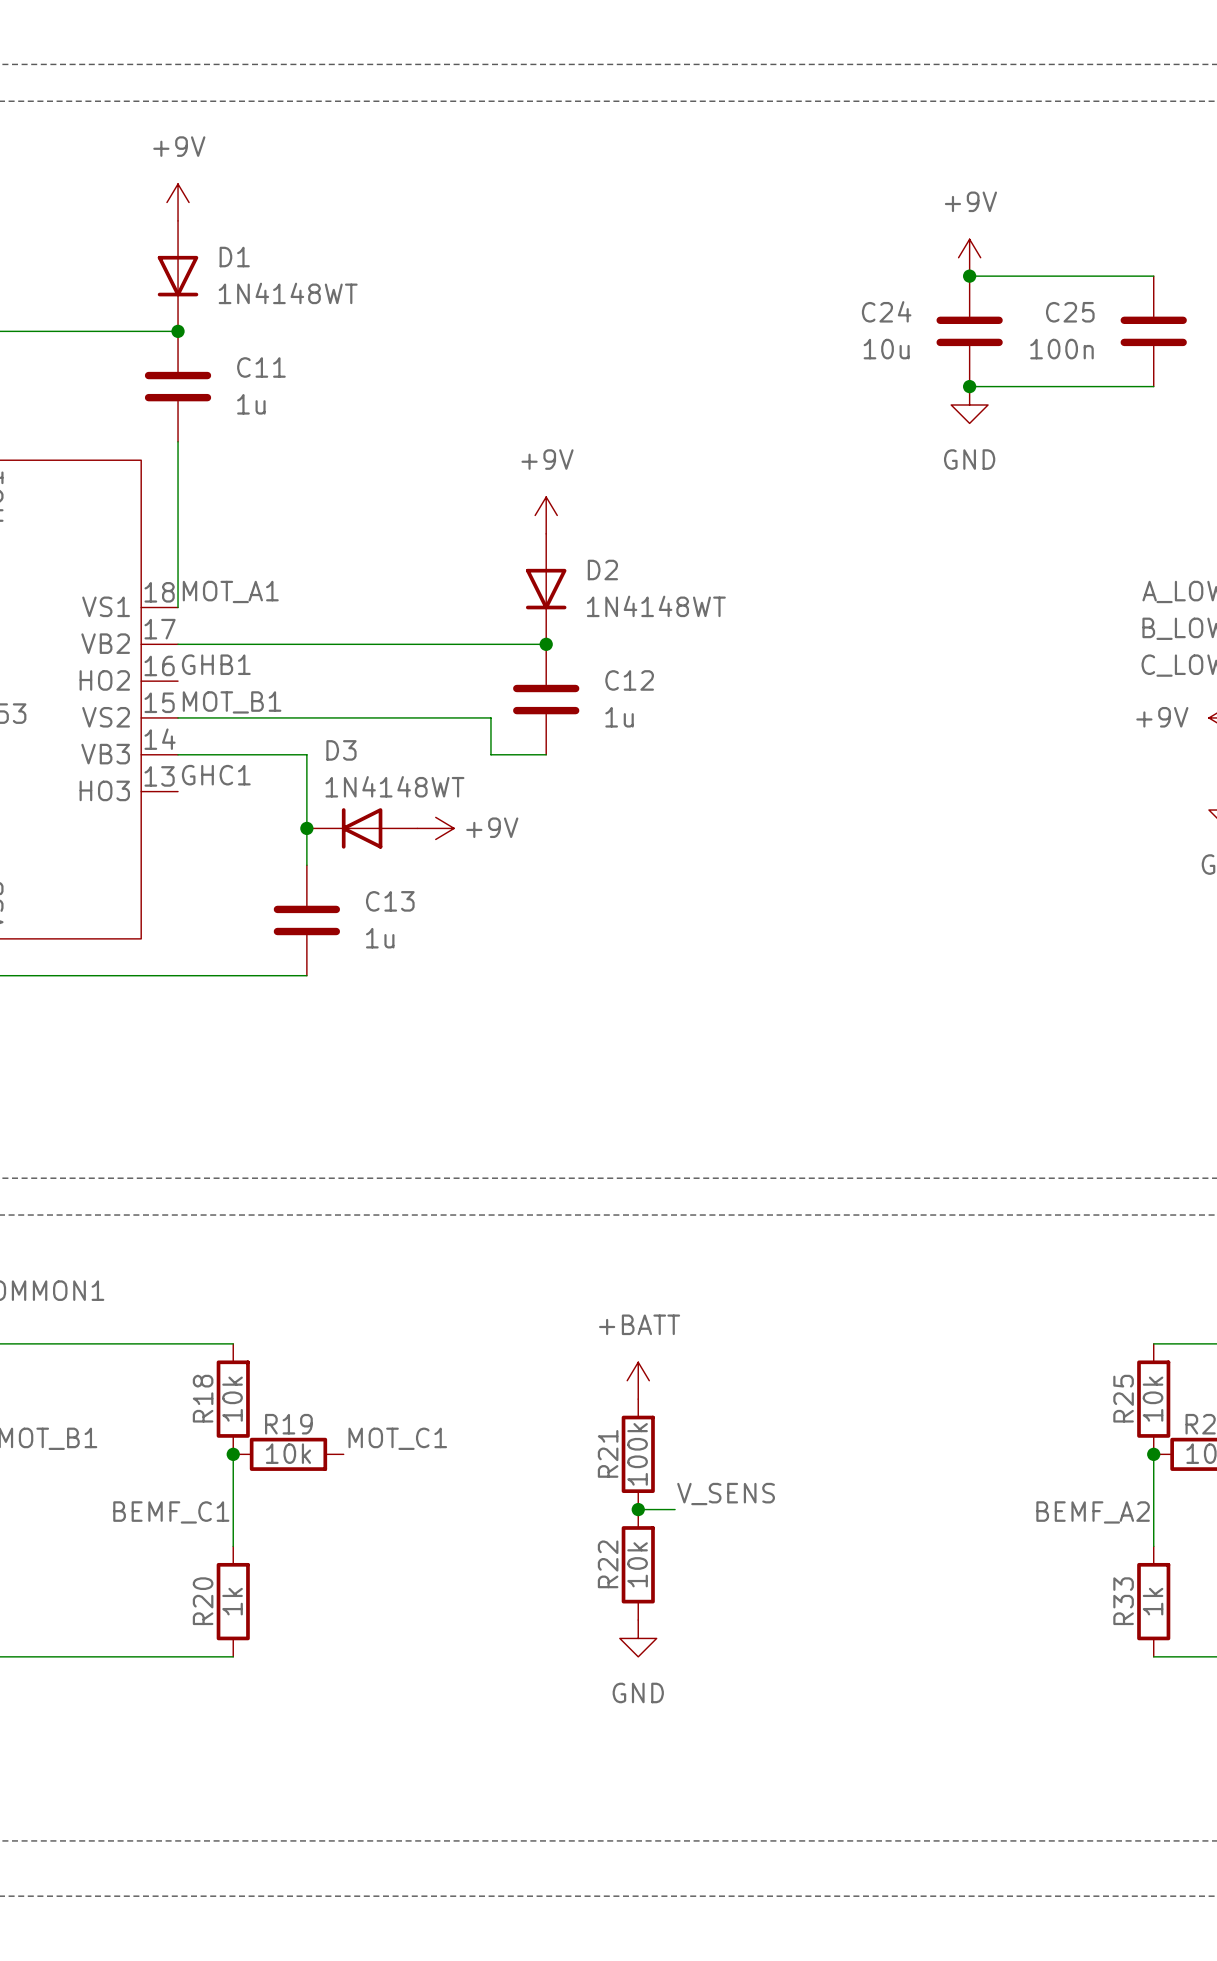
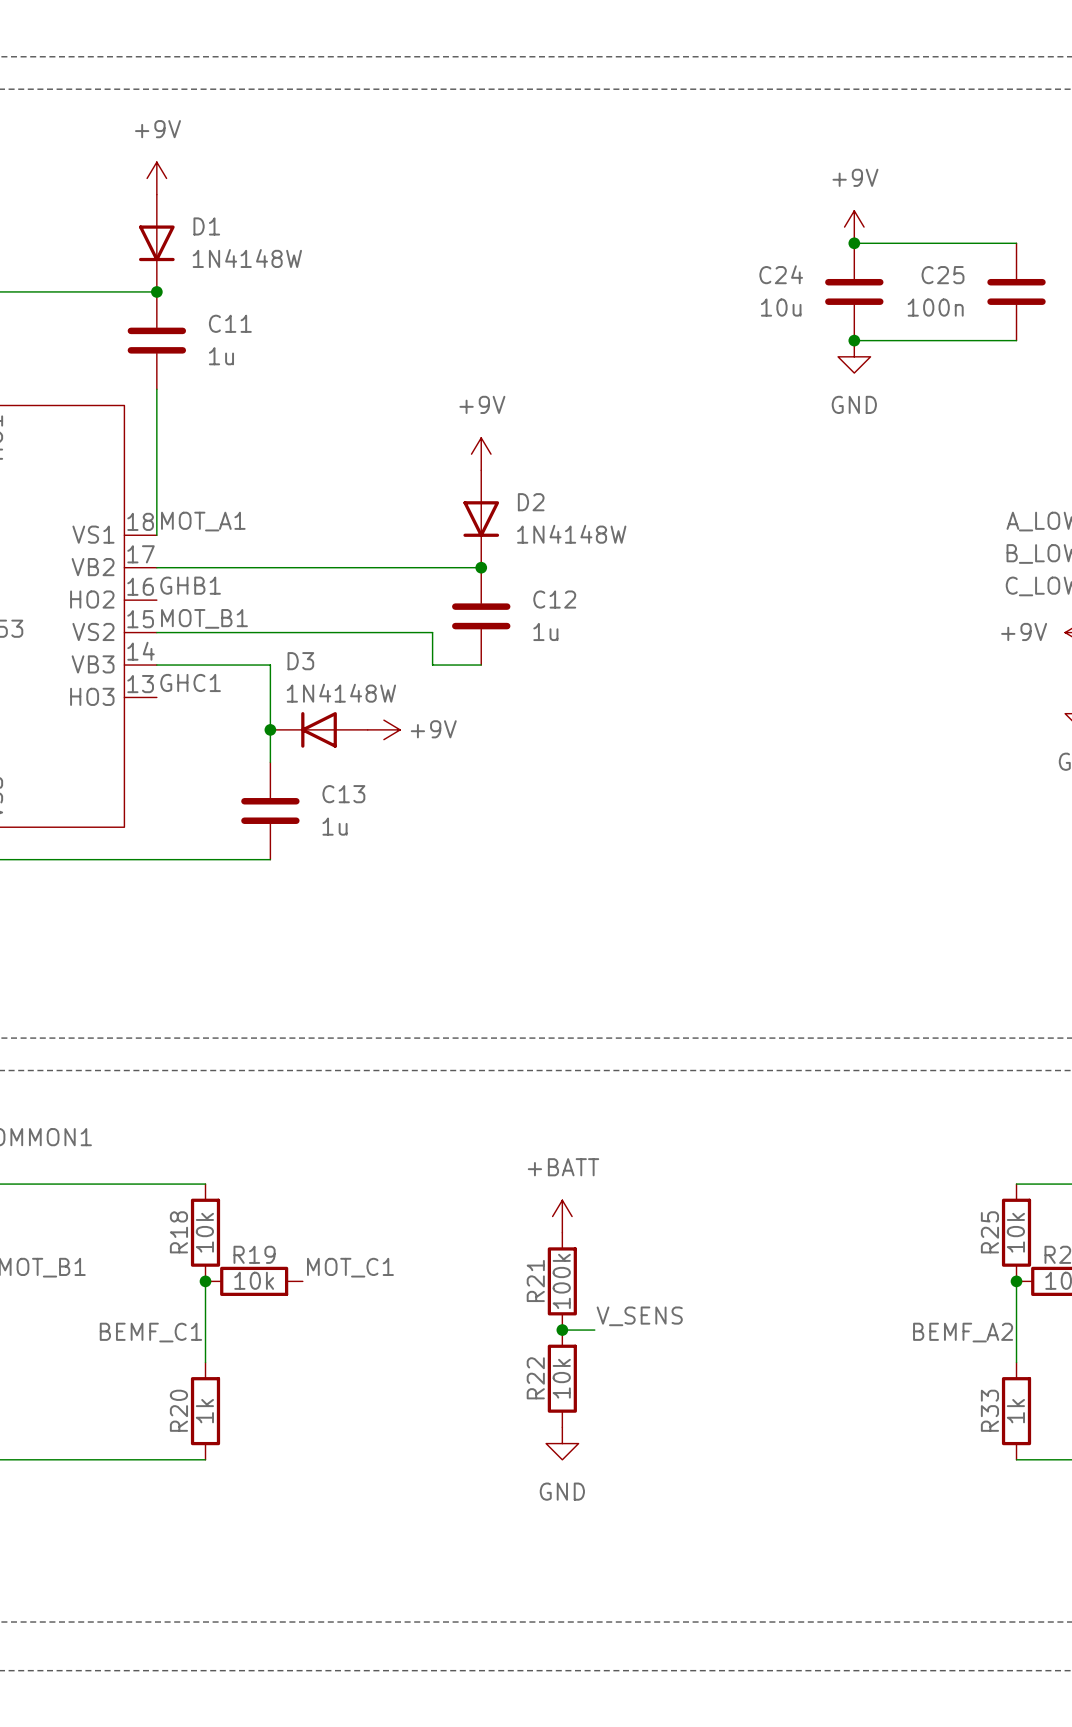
D1 value: 1N4148WT (288, 293) -> 1N4148W (247, 258)
D2 value: 1N4148WT (656, 606) -> 1N4148W (571, 534)
D3 value: 1N4148WT (394, 786) -> 1N4148W (341, 693)

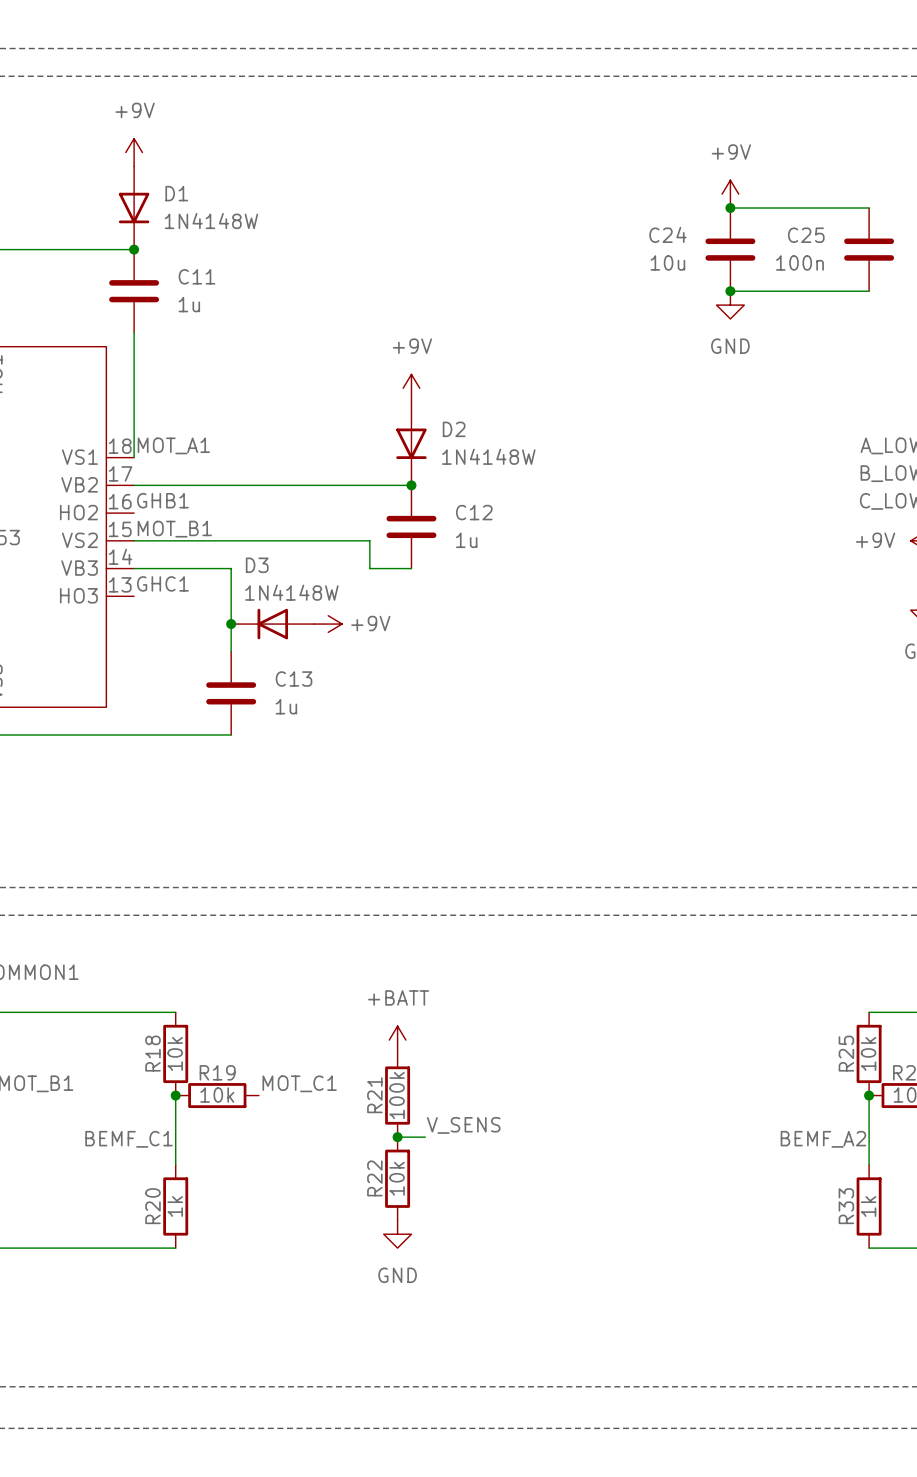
power symbol position: +BATT (562, 1216) -> +BATT (397, 1040)
R21 position: (562, 1281) -> (397, 1095)
label position: V_SENS (639, 1316) -> V_SENS (463, 1125)
junction: none -> (397, 1137)
wire: (562, 1330) (594, 1330) -> (397, 1137) (425, 1137)
junction: (562, 1330) -> none
R22 position: (562, 1378) -> (397, 1178)
power symbol position: GND (562, 1443) -> GND (397, 1234)

